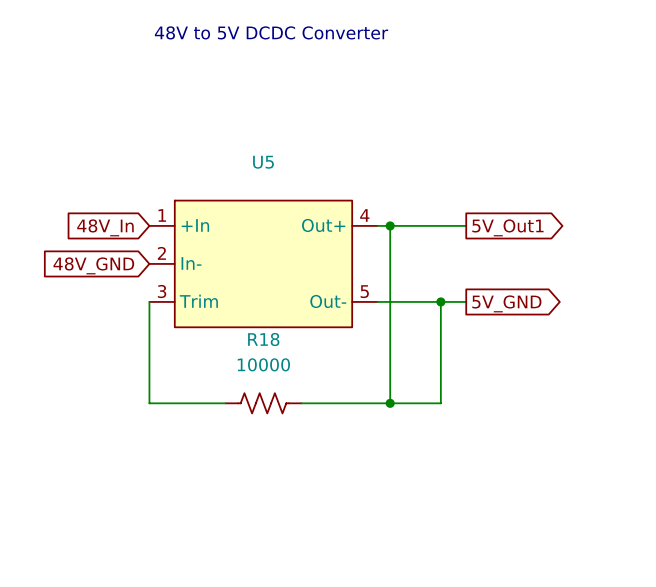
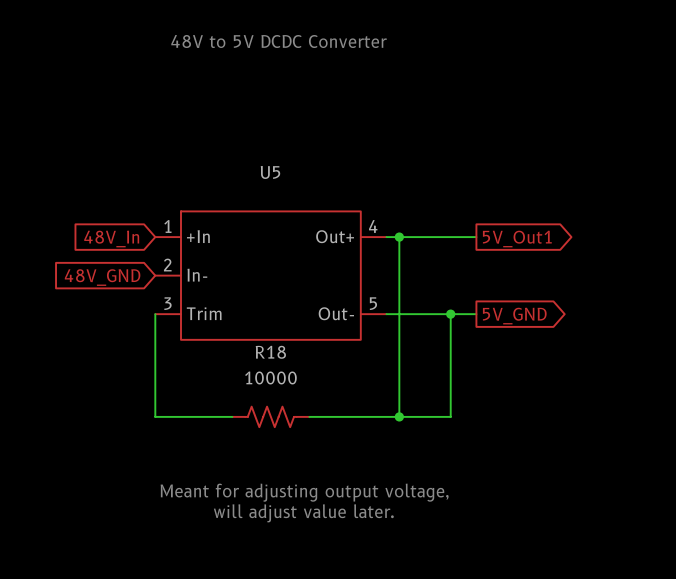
text: none -> Meant for adjusting output voltage, (304, 492)
text: none -> will adjust value later. (303, 513)

